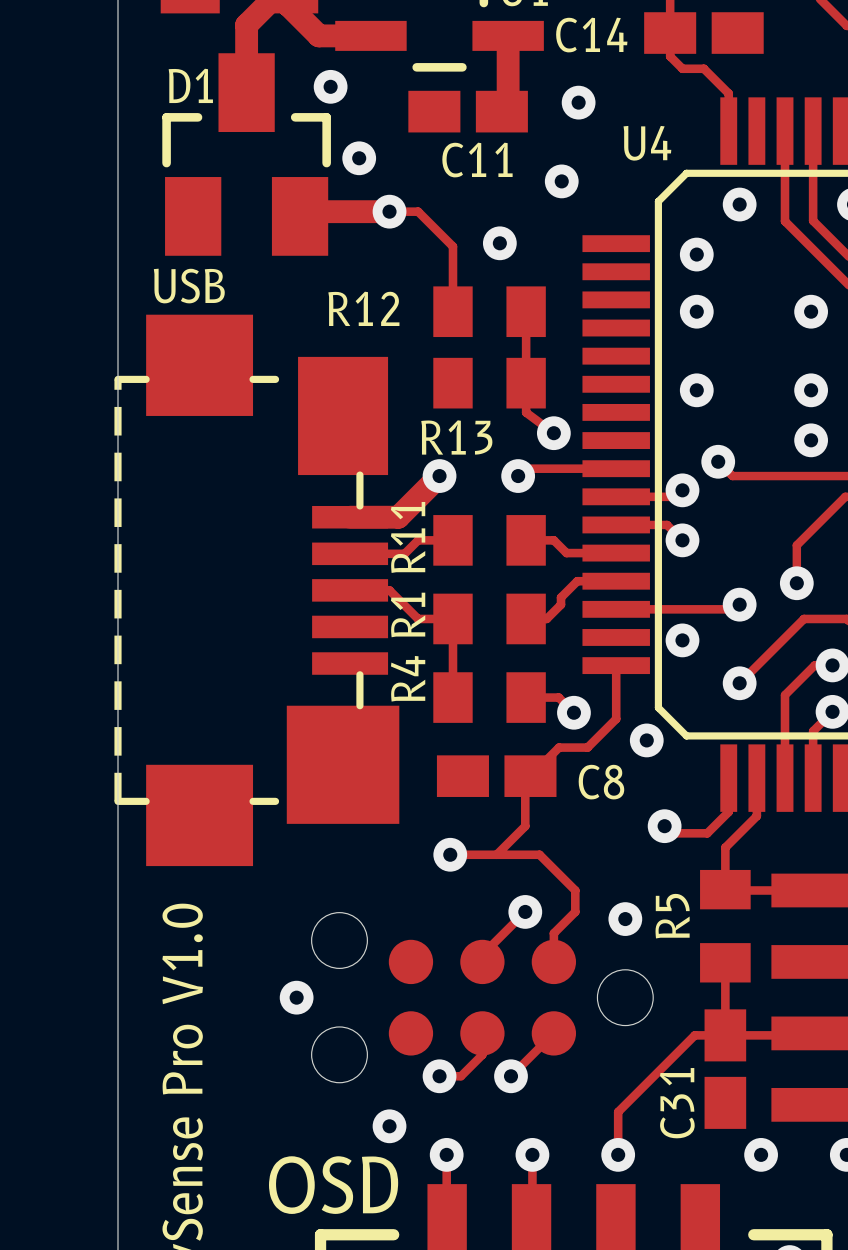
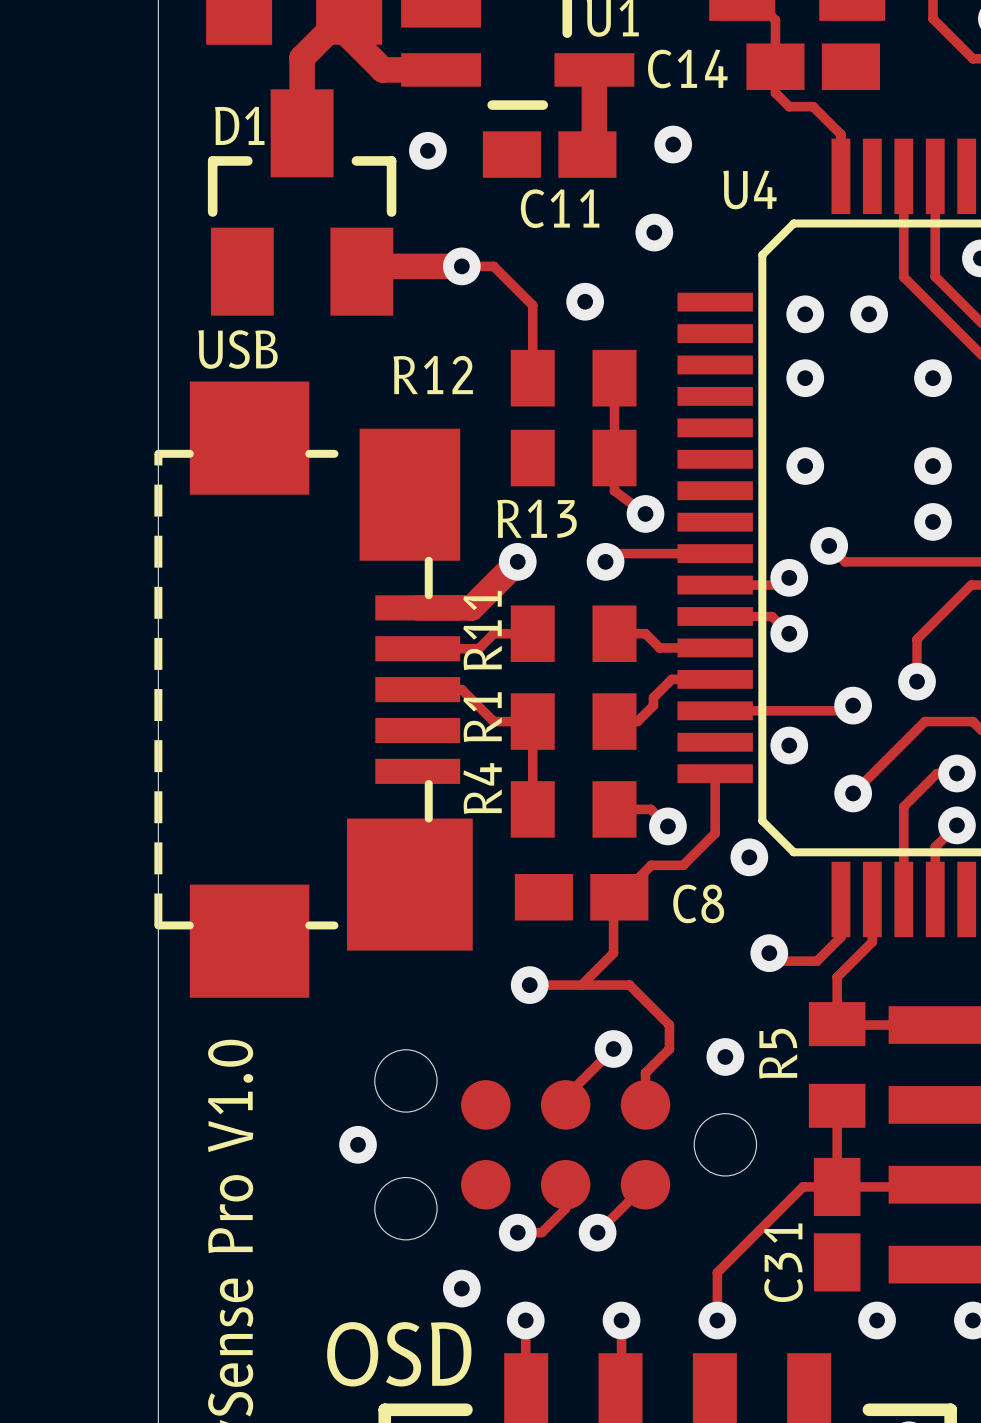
via position: (330, 86) -> (427, 150)
via: (359, 158) -> none
via position: (739, 204) -> (869, 314)

